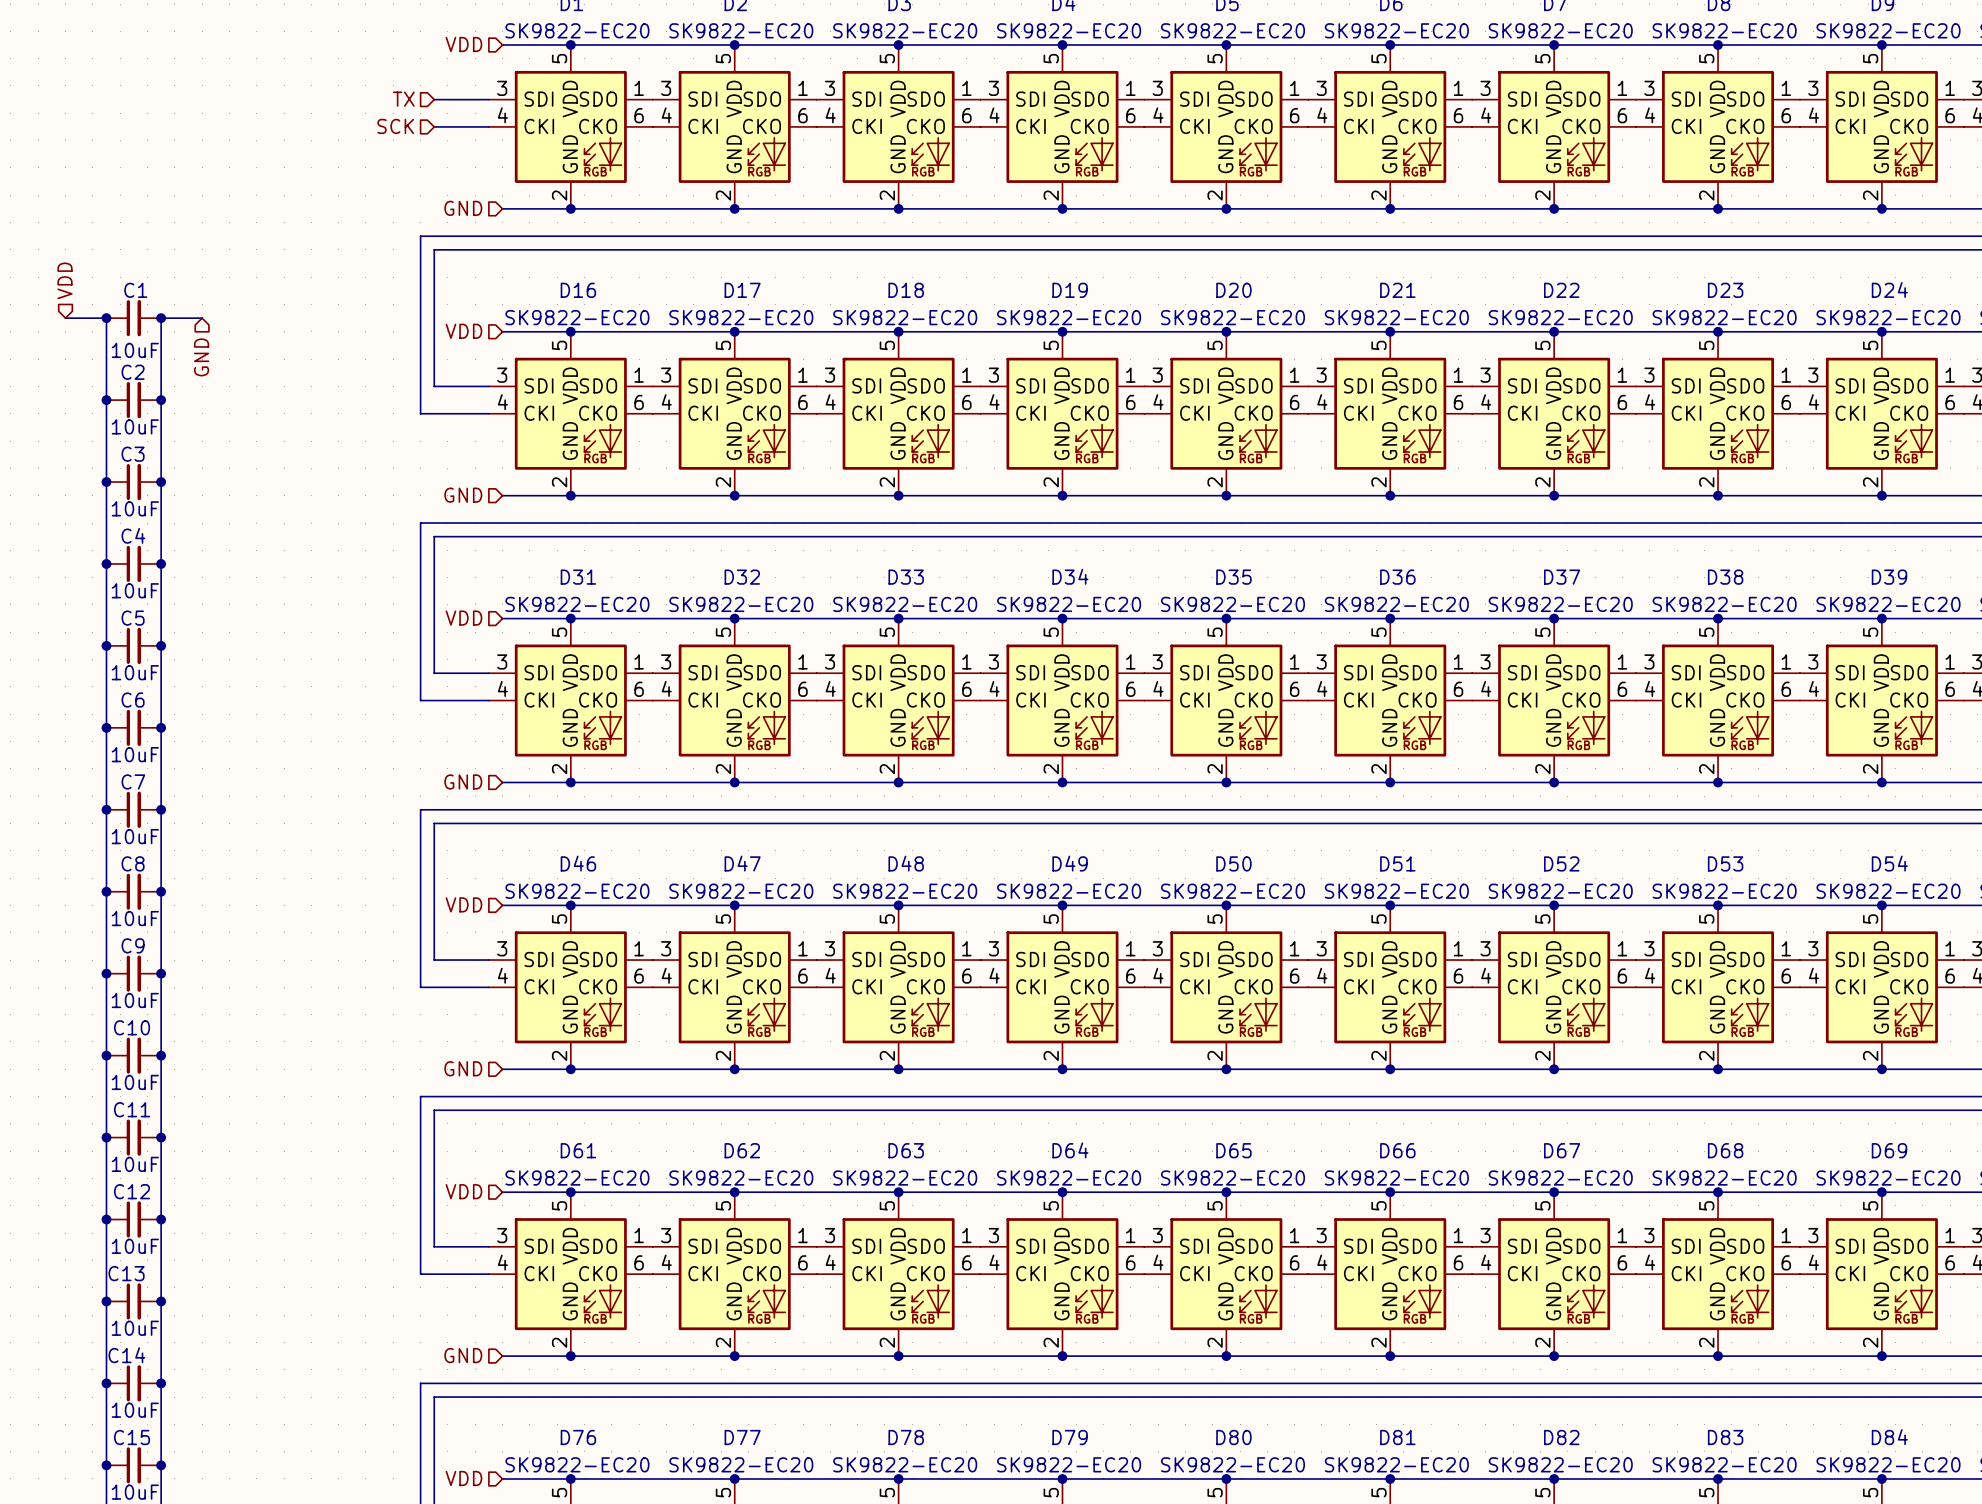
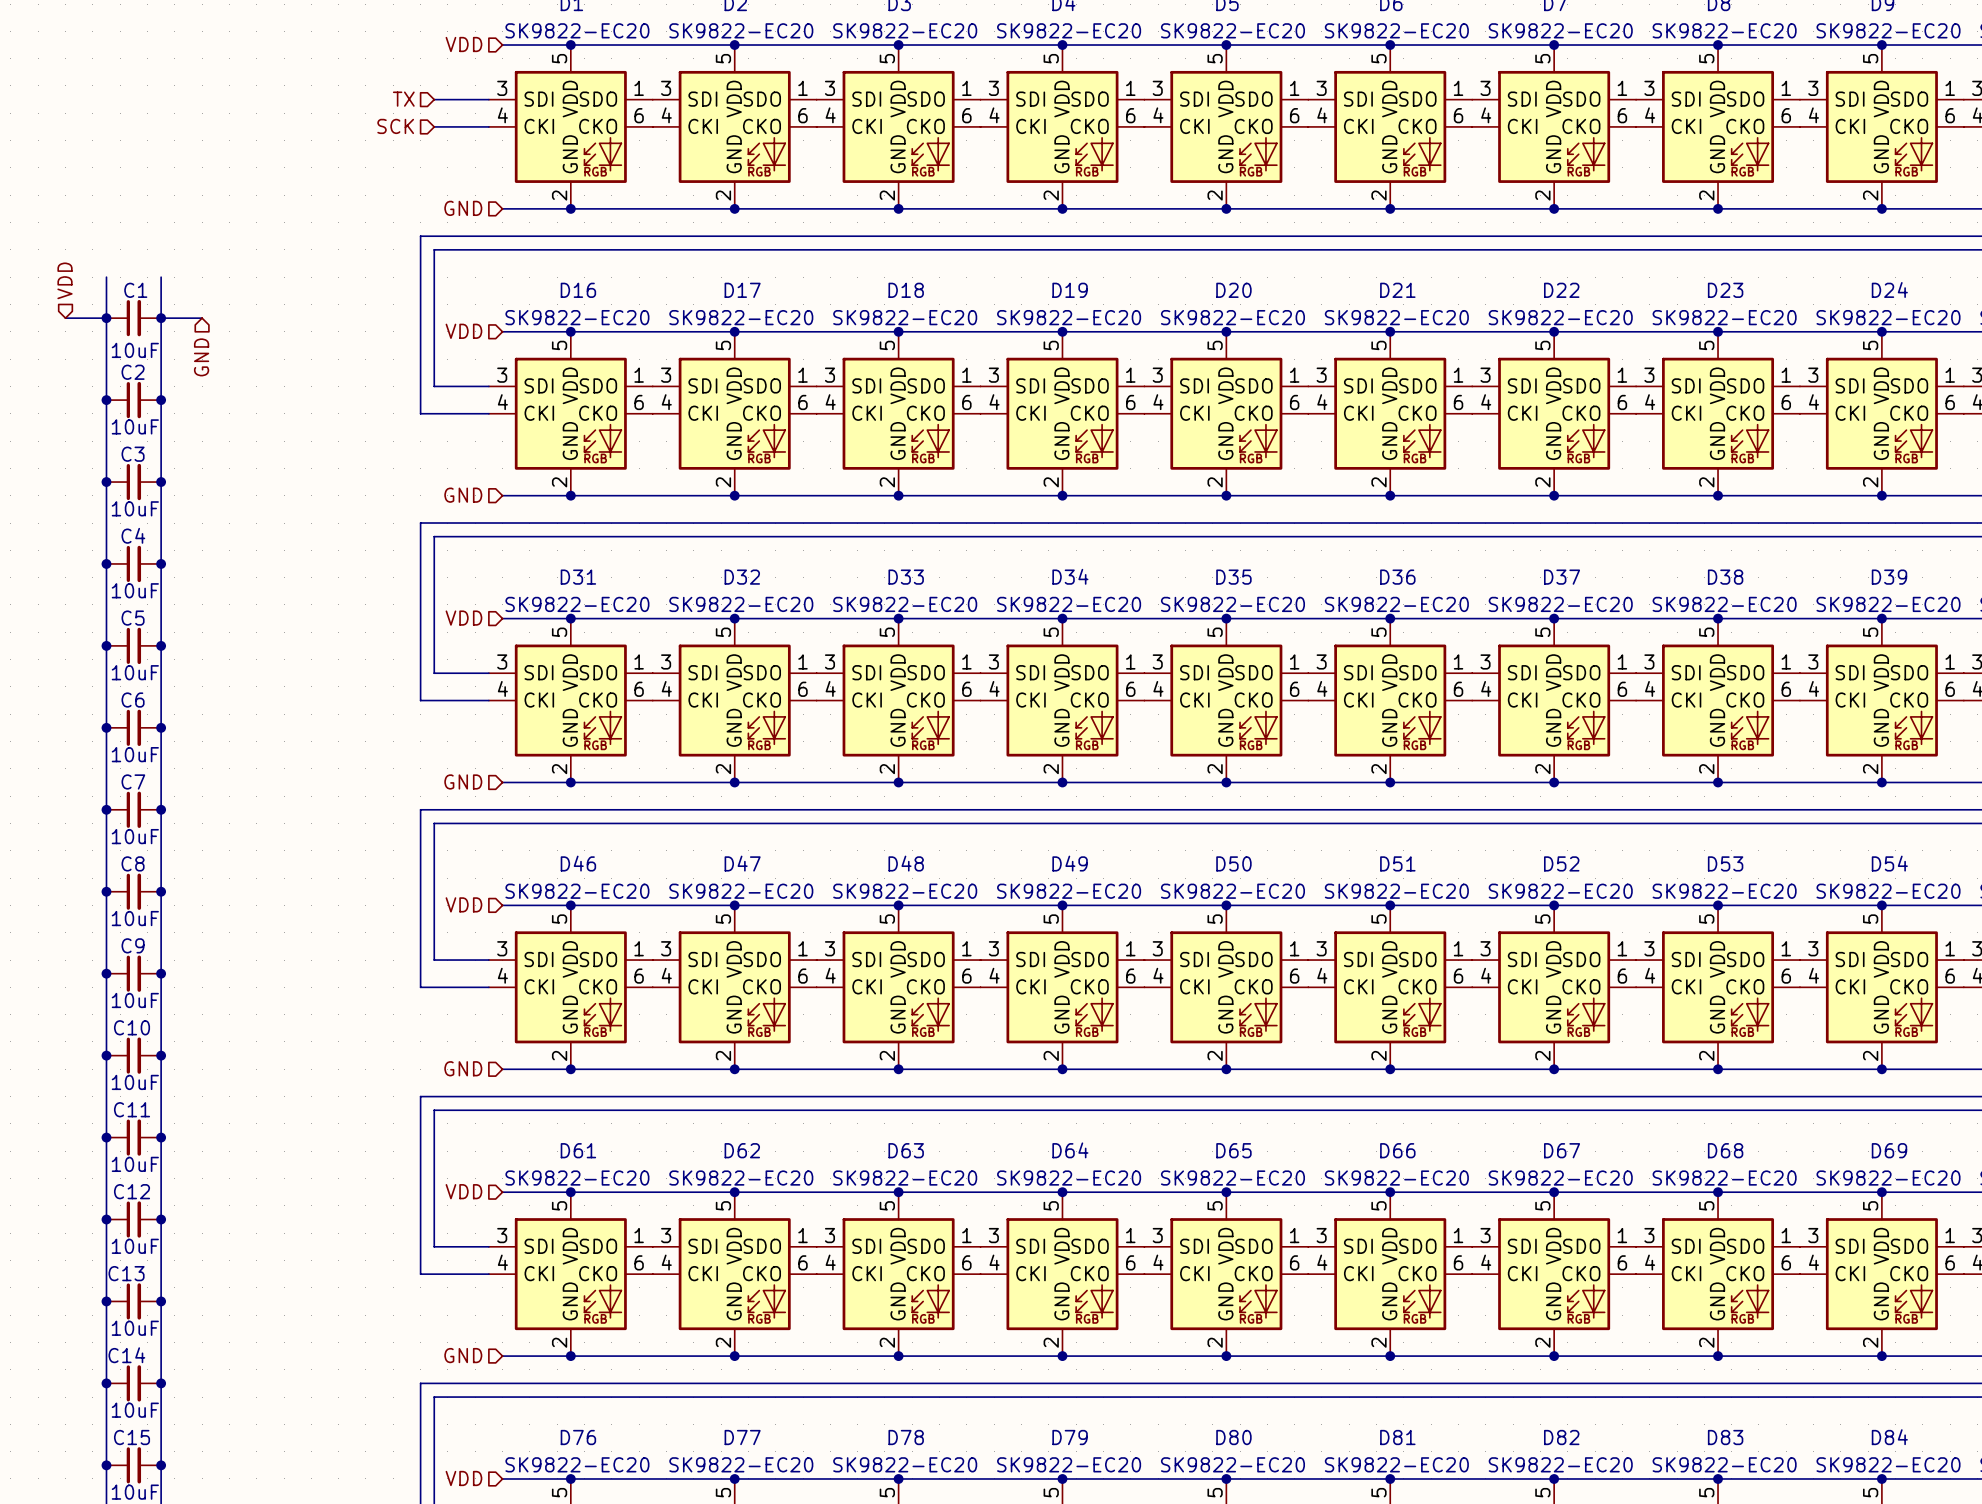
wire: none -> (106, 277) (106, 318)
wire: none -> (161, 277) (161, 318)

